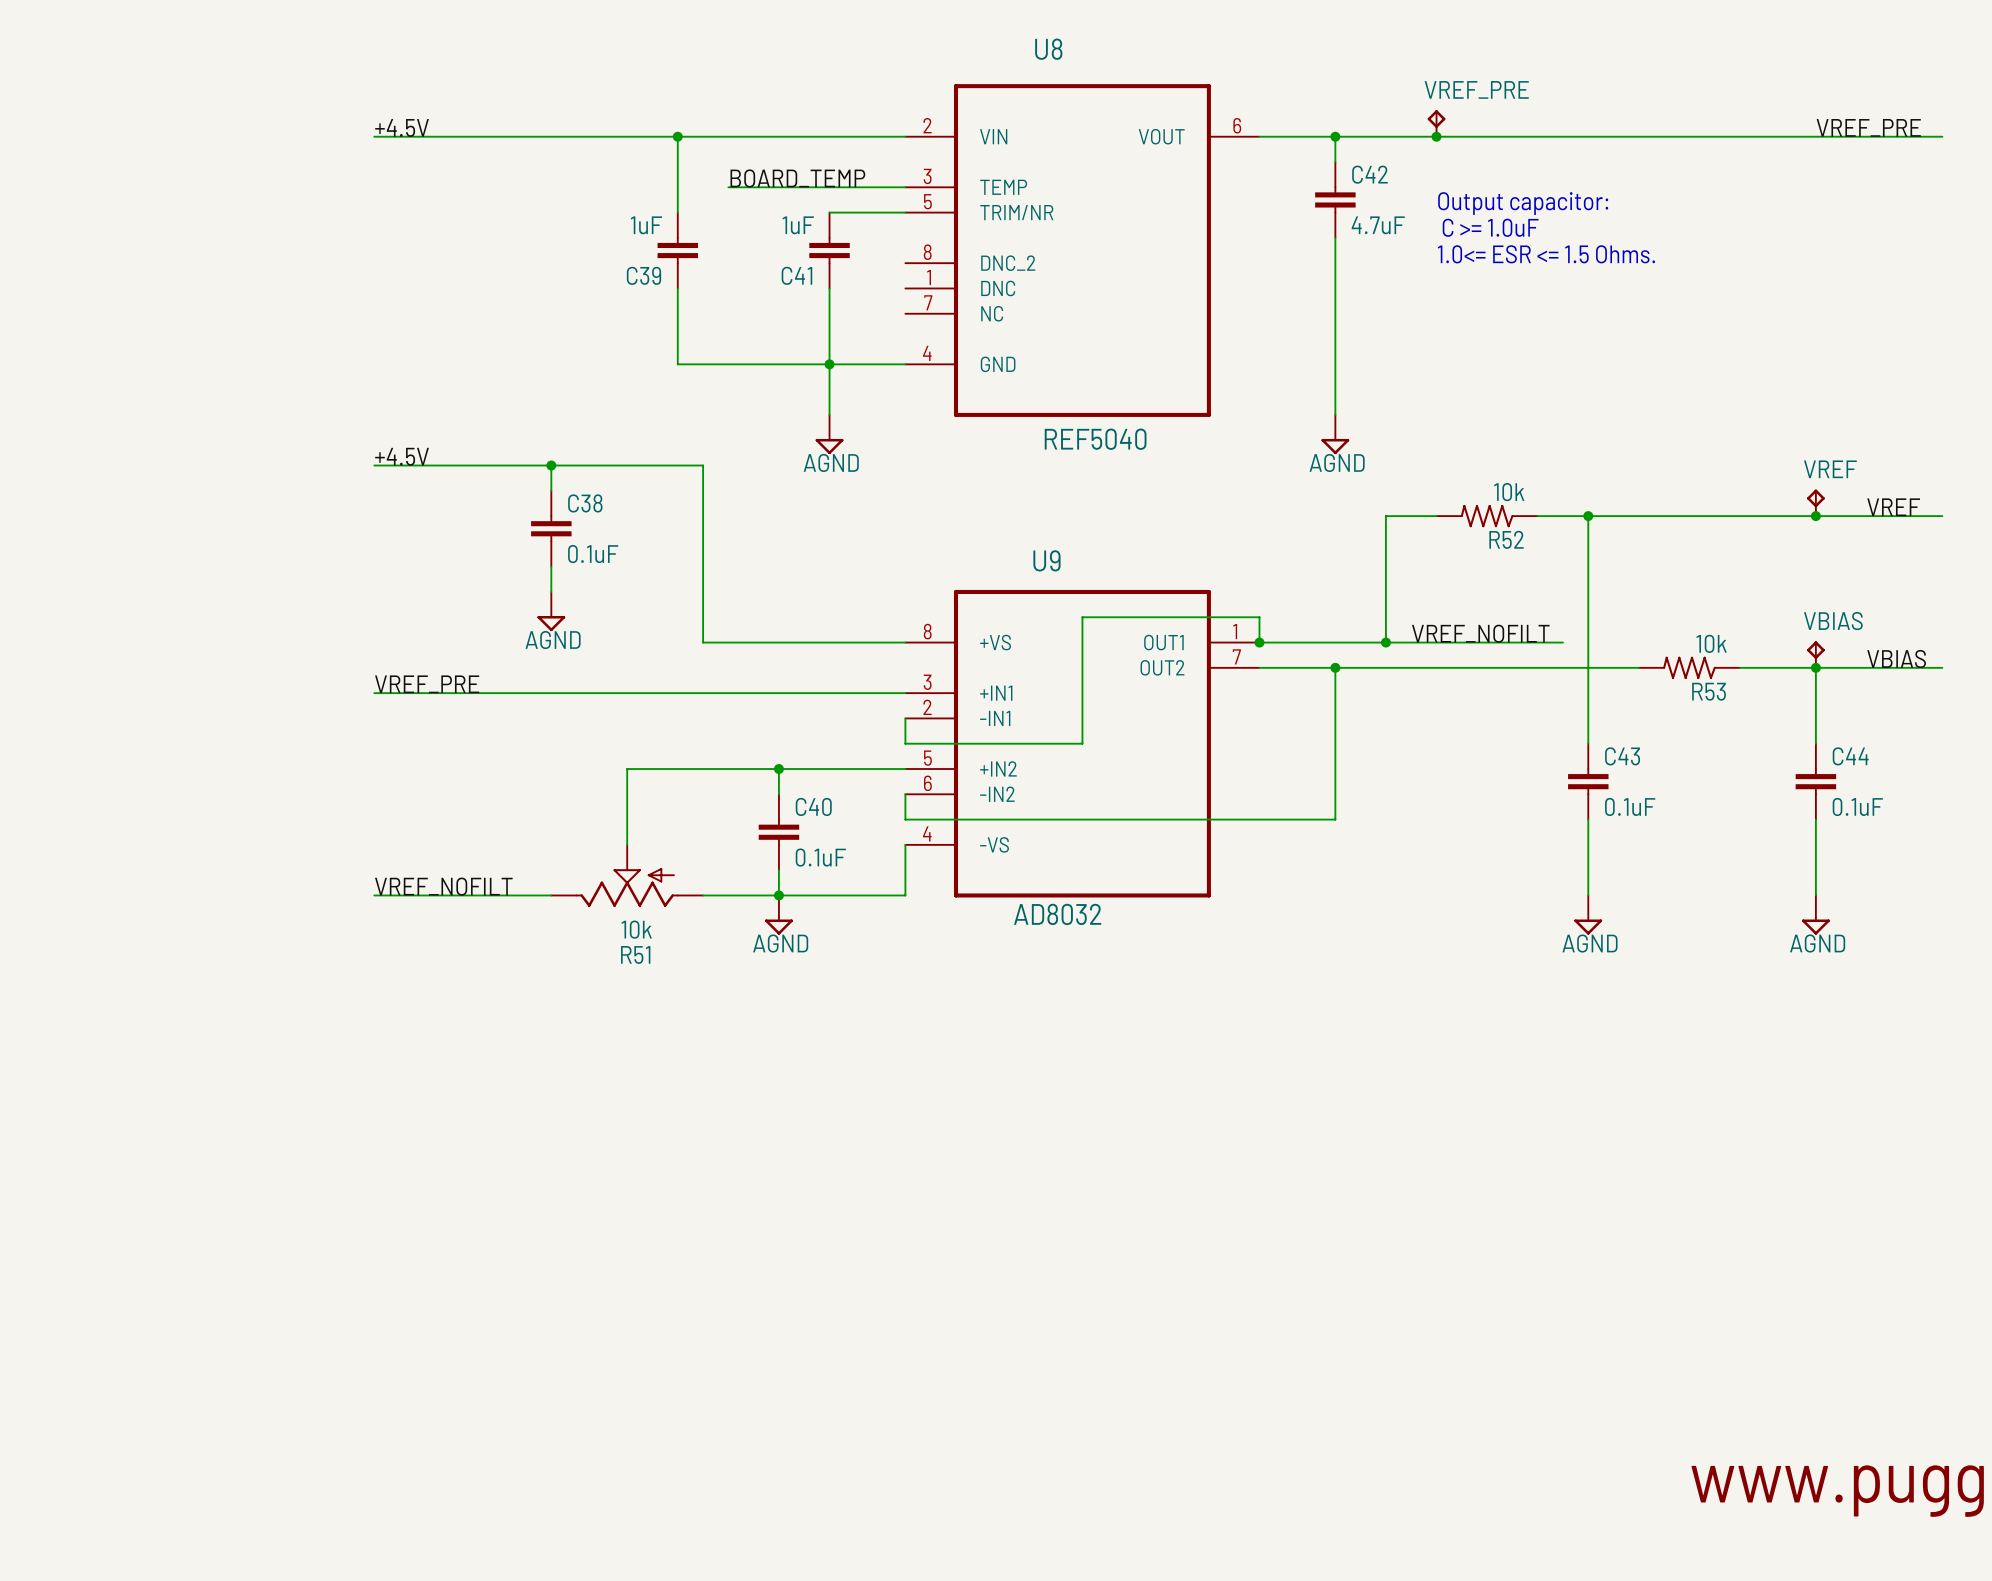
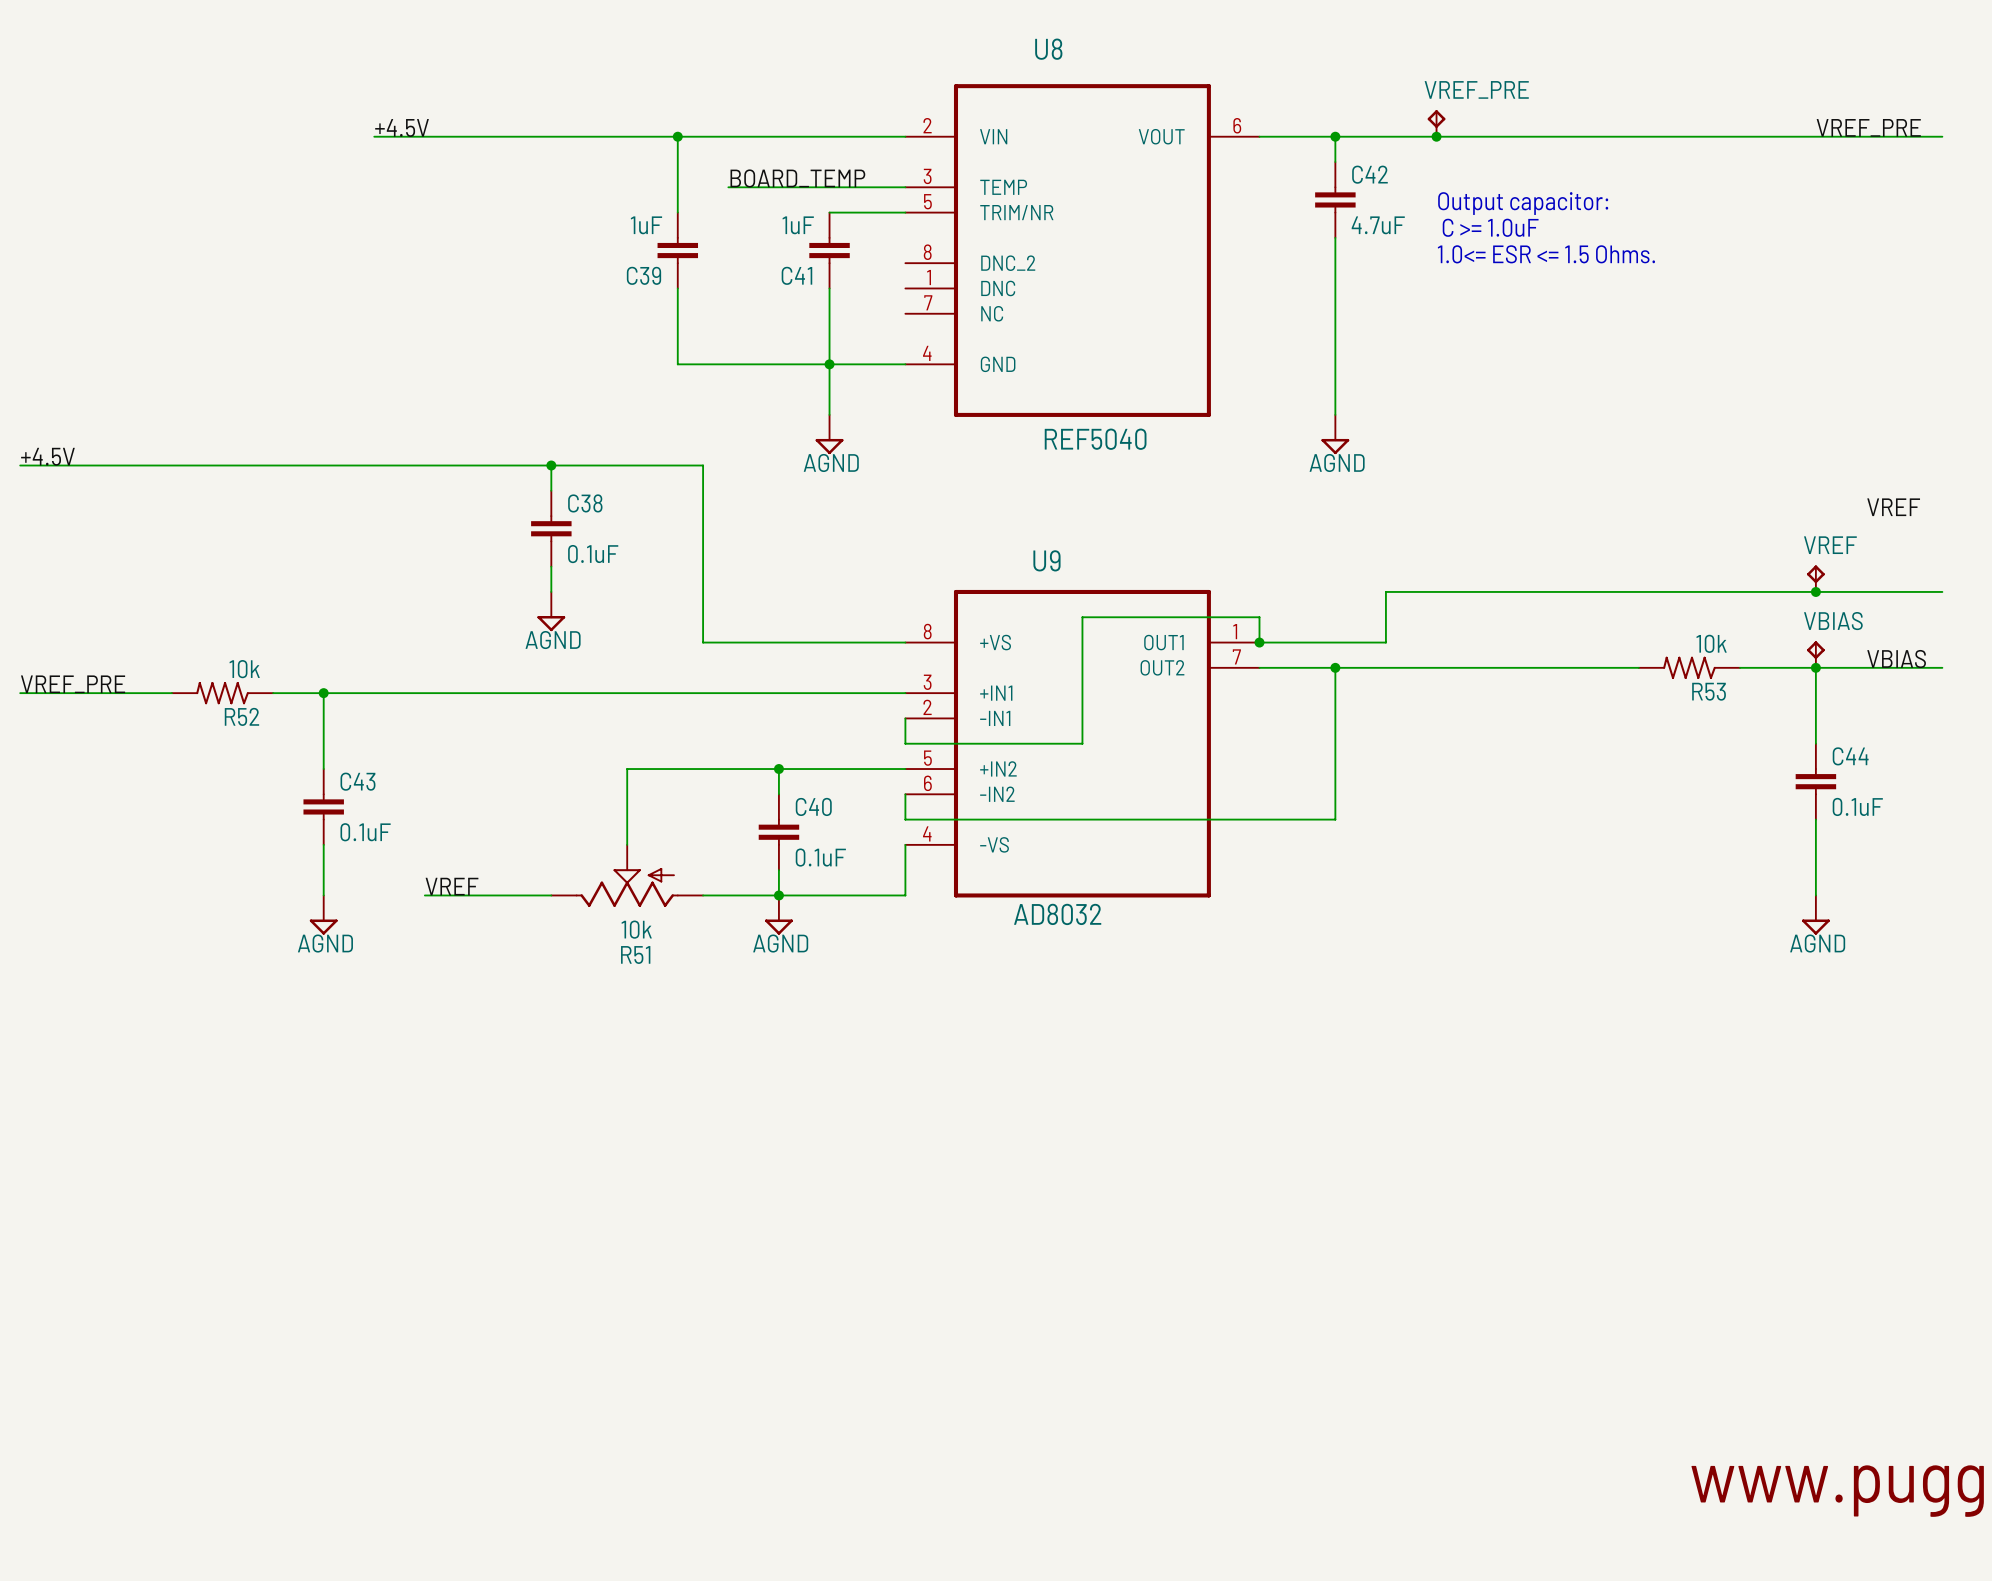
label: none -> +4.5V (47, 456)
label: +4.5V (402, 456) -> none
wire: none -> (20, 465) (374, 465)
VREF position: (1815, 502) -> (1815, 578)
wire: (1436, 516) (1385, 516) (1385, 591) -> (1942, 591) (1385, 591)
R52 position: (1487, 516) -> (222, 693)
wire: (1537, 516) (1942, 516) -> none
wire: (1588, 516) (1588, 743) -> none
junction: (1588, 516) -> none
junction: (1815, 516) -> none
junction: none -> (1815, 591)
label: VREF_NOFILT (1480, 633) -> none
wire: (1385, 642) (1562, 642) -> none
junction: (1385, 642) -> none
label: none -> VREF_PRE (73, 684)
label: VREF_PRE (427, 684) -> none
wire: none -> (20, 693) (171, 693)
wire: none -> (273, 693) (374, 693)
wire: none -> (323, 693) (323, 769)
junction: none -> (323, 693)
C43 position: (1588, 781) -> (323, 806)
wire: (1588, 819) (1588, 895) -> none
wire: none -> (323, 844) (323, 895)
label: VREF_NOFILT (443, 886) -> none
label: none -> VREF (452, 886)
wire: (374, 895) (424, 895) -> none
power symbol: none -> AGND (323, 915)
power symbol: AGND (1588, 915) -> none

